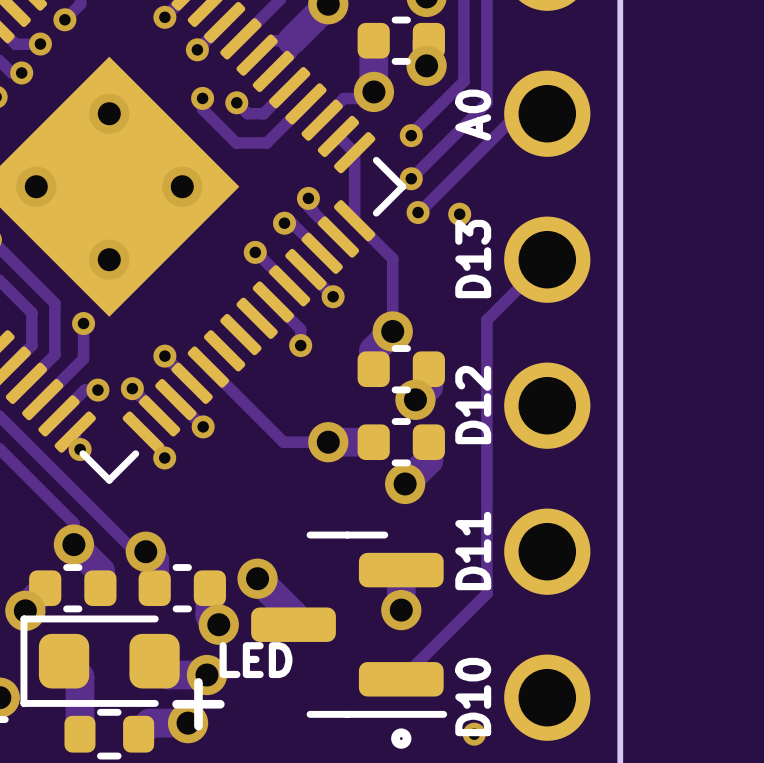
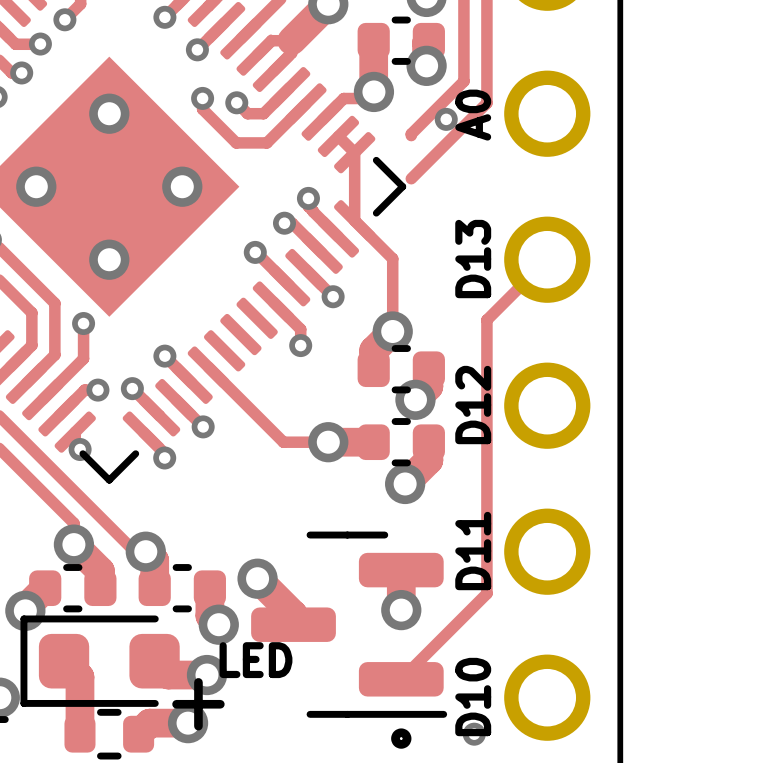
track: (547, 113) (518, 113) (418, 212) -> none
via: none -> (446, 119)
via: (411, 135) -> none
via: (411, 178) -> none
via: (418, 212) -> none
via: (459, 214) -> none

